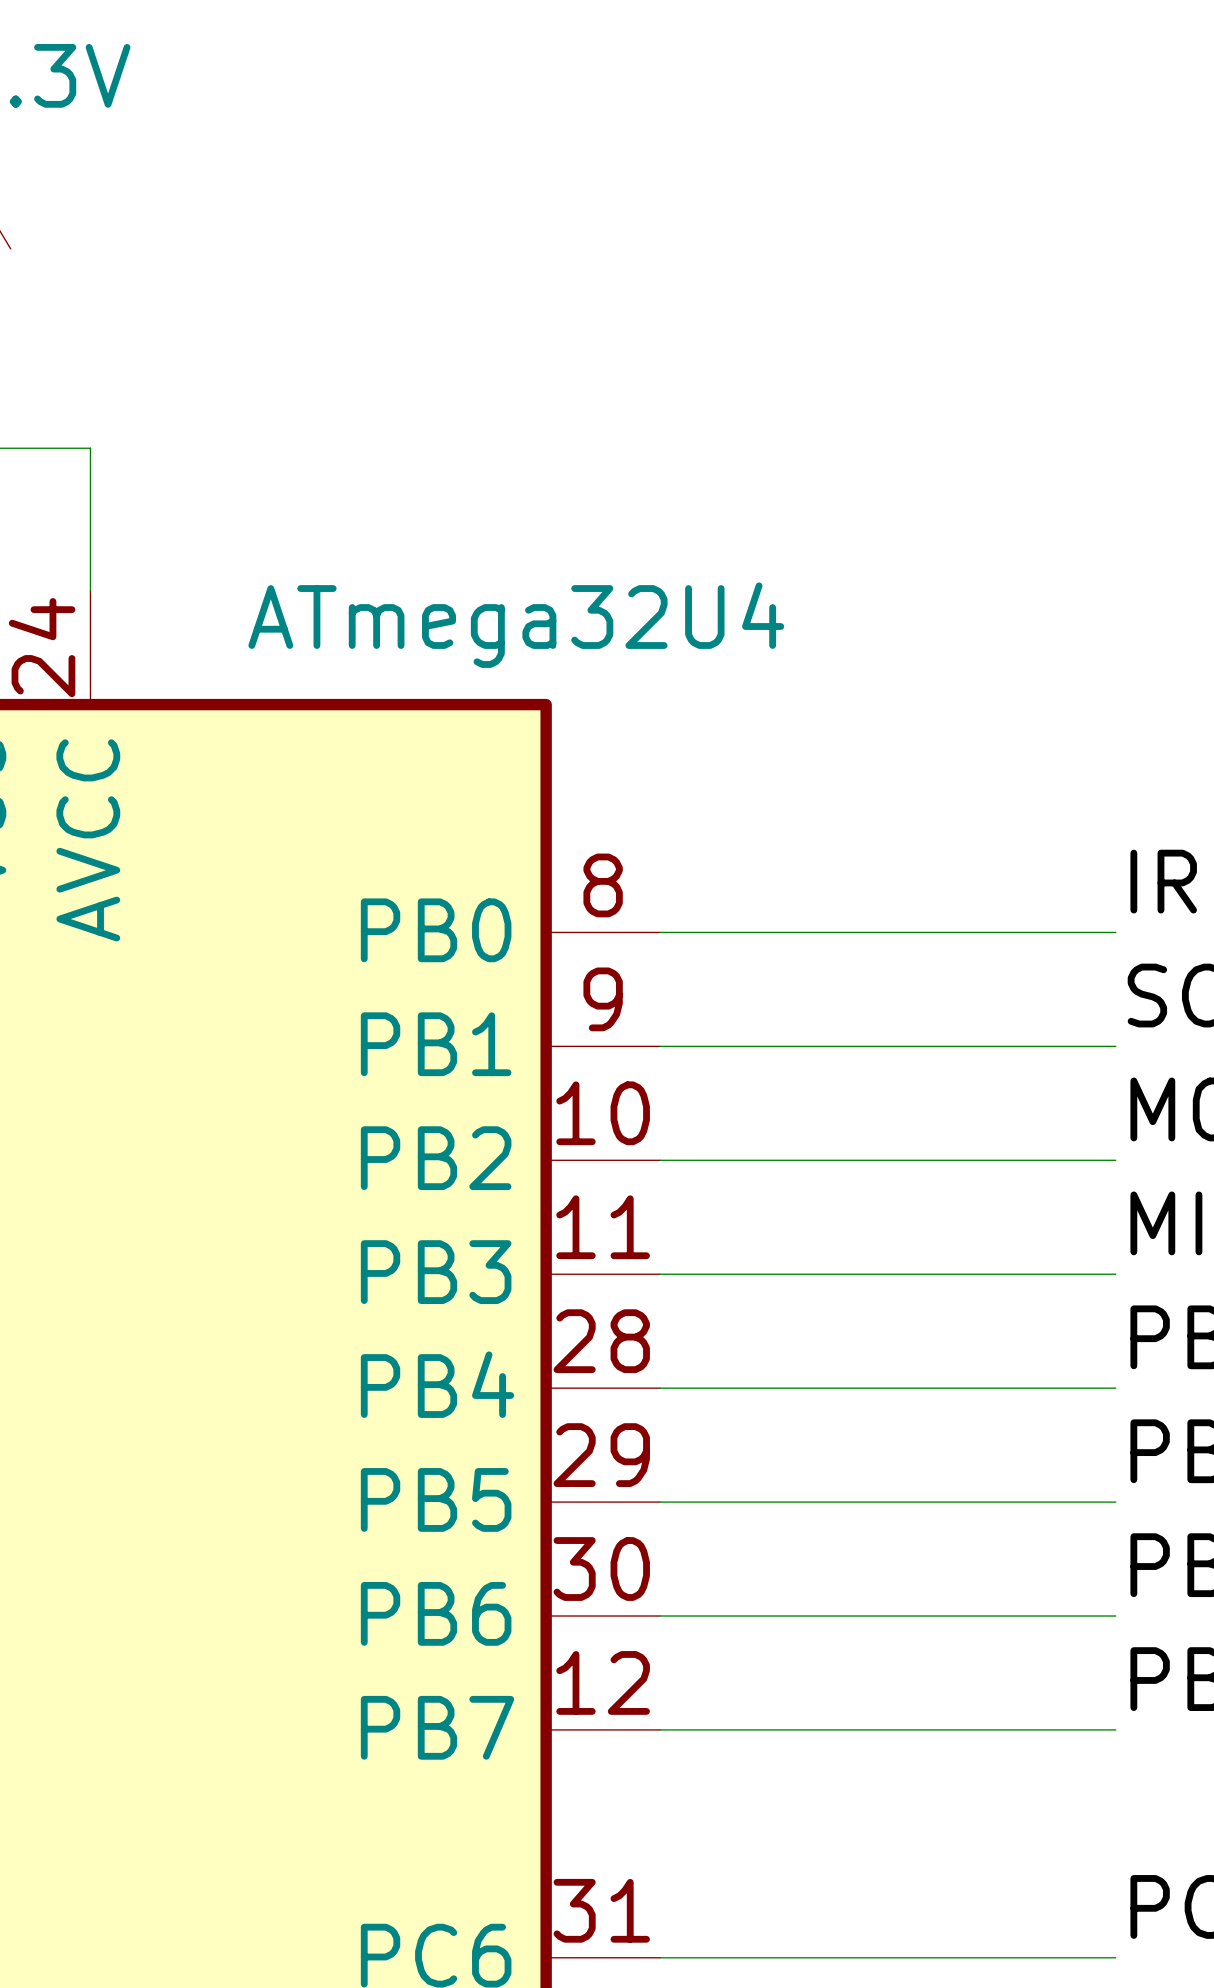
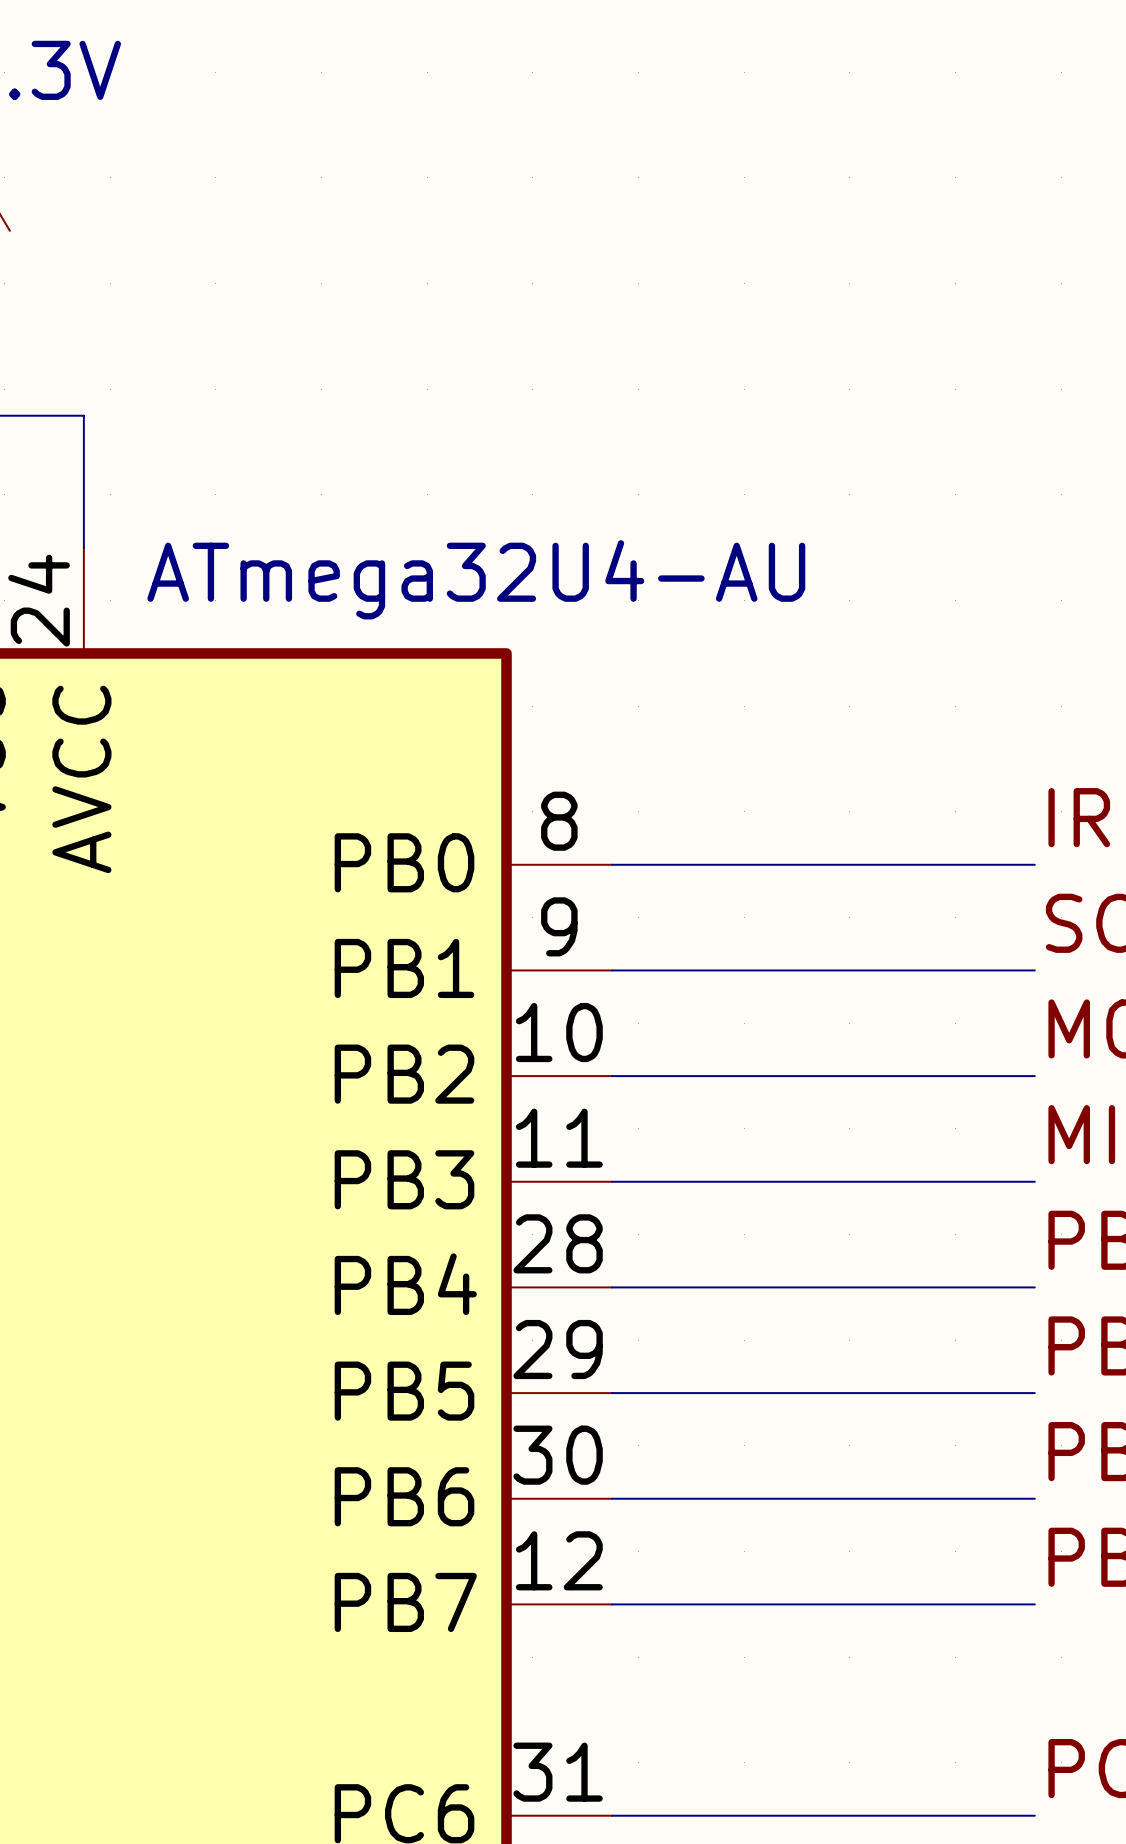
part value: ATmega32U4 (516, 625) -> ATmega32U4-AU (476, 579)

